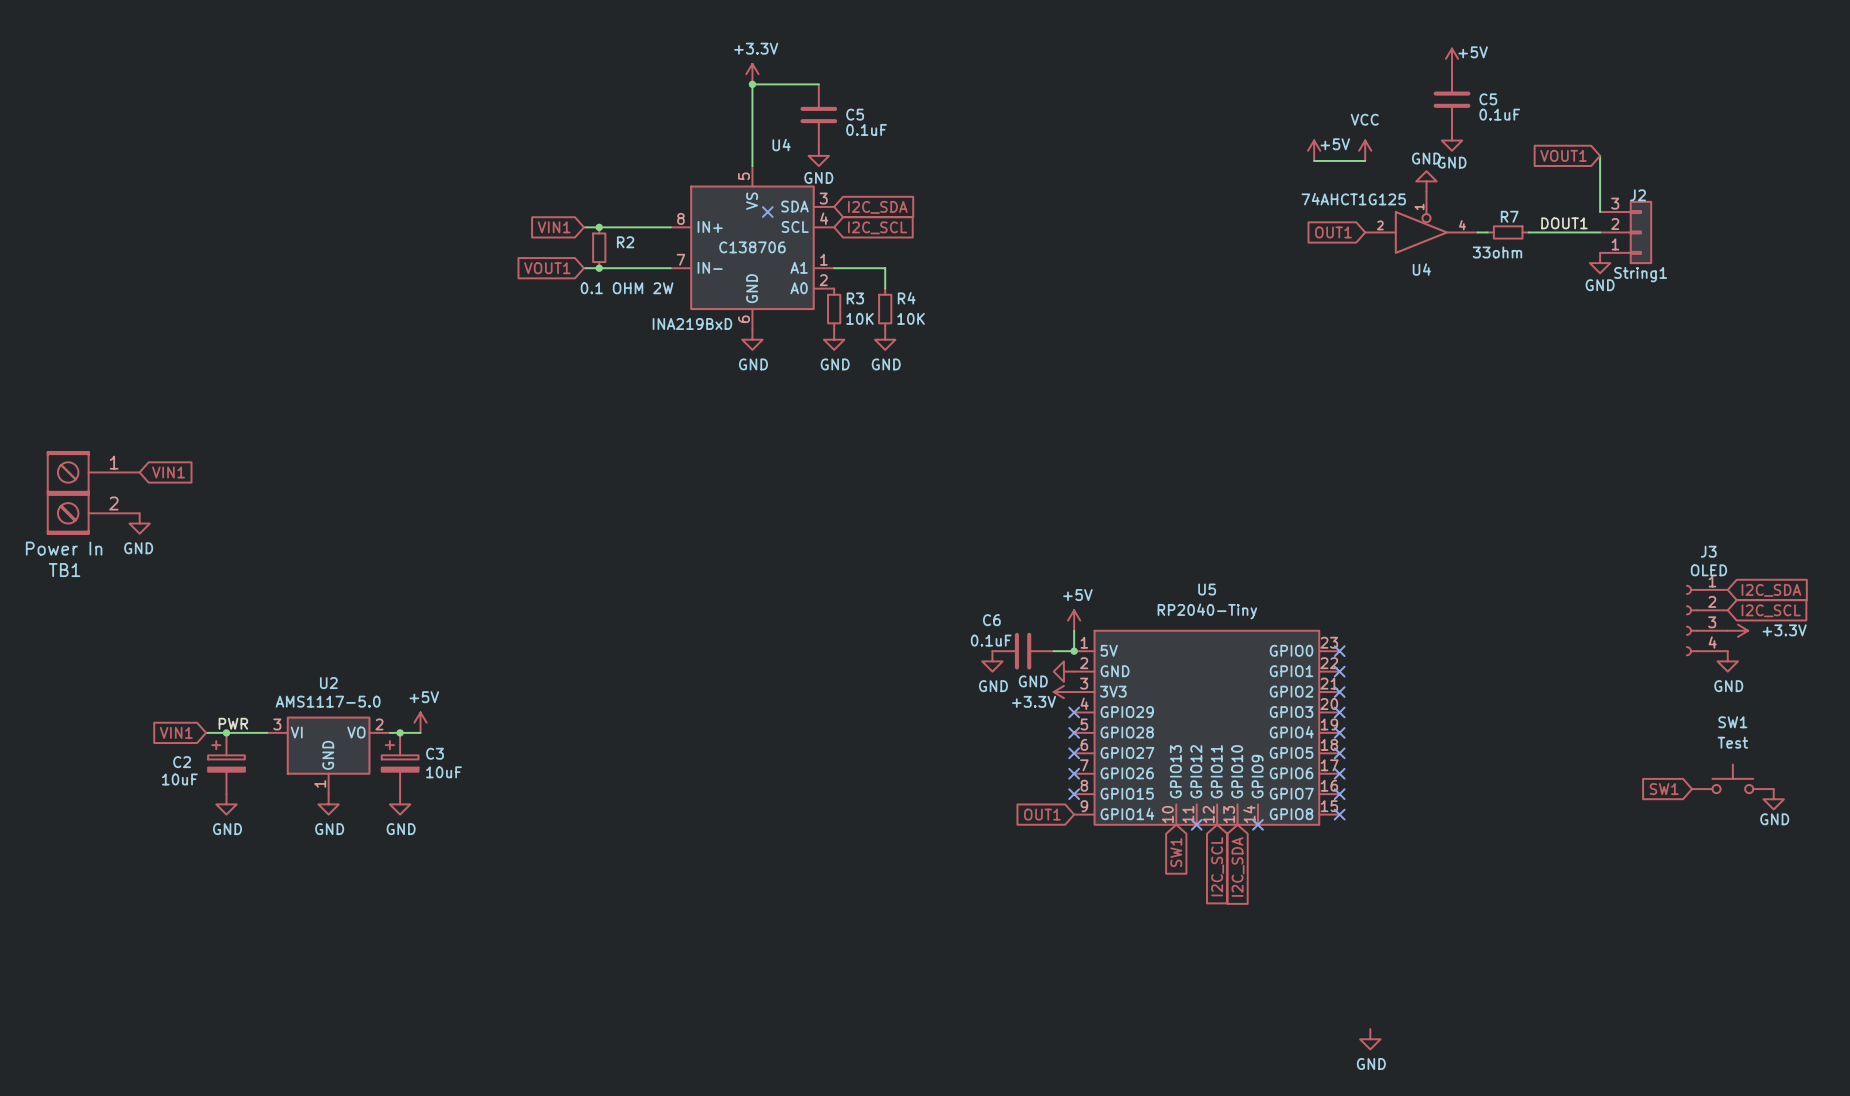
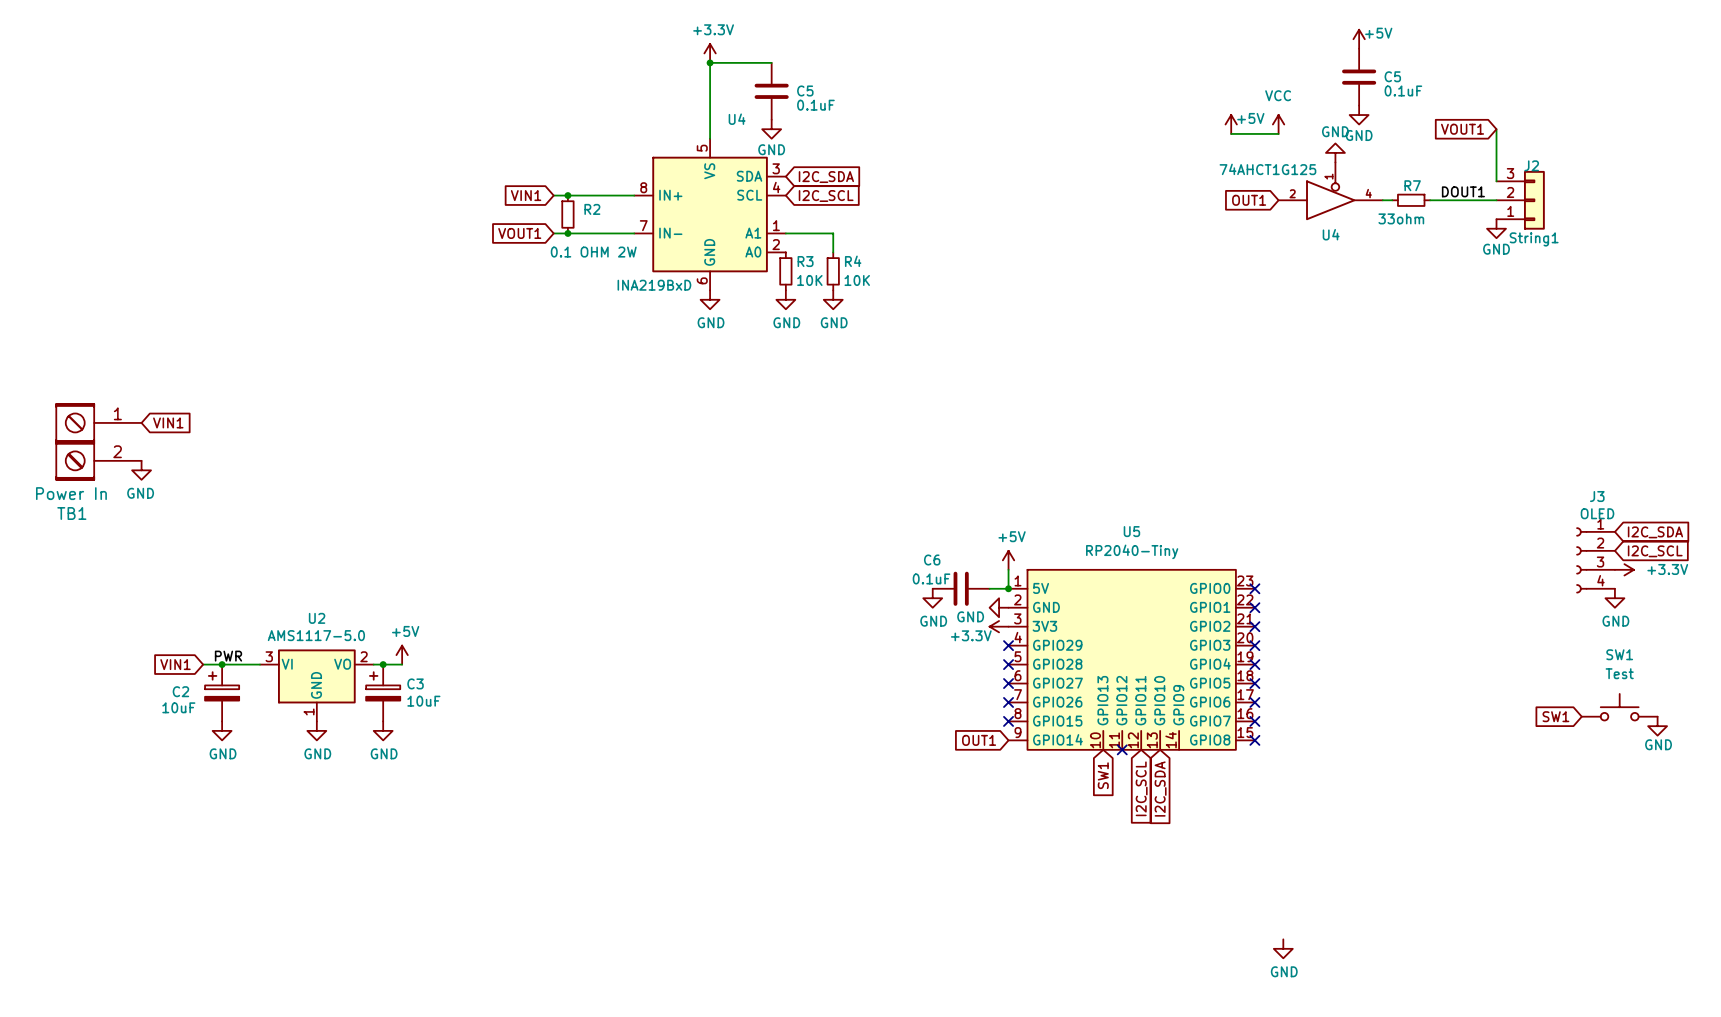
no-connect mark: (767, 212) -> none
U4 text: C138706 (752, 247) -> none
no-connect mark: (1257, 824) -> none

